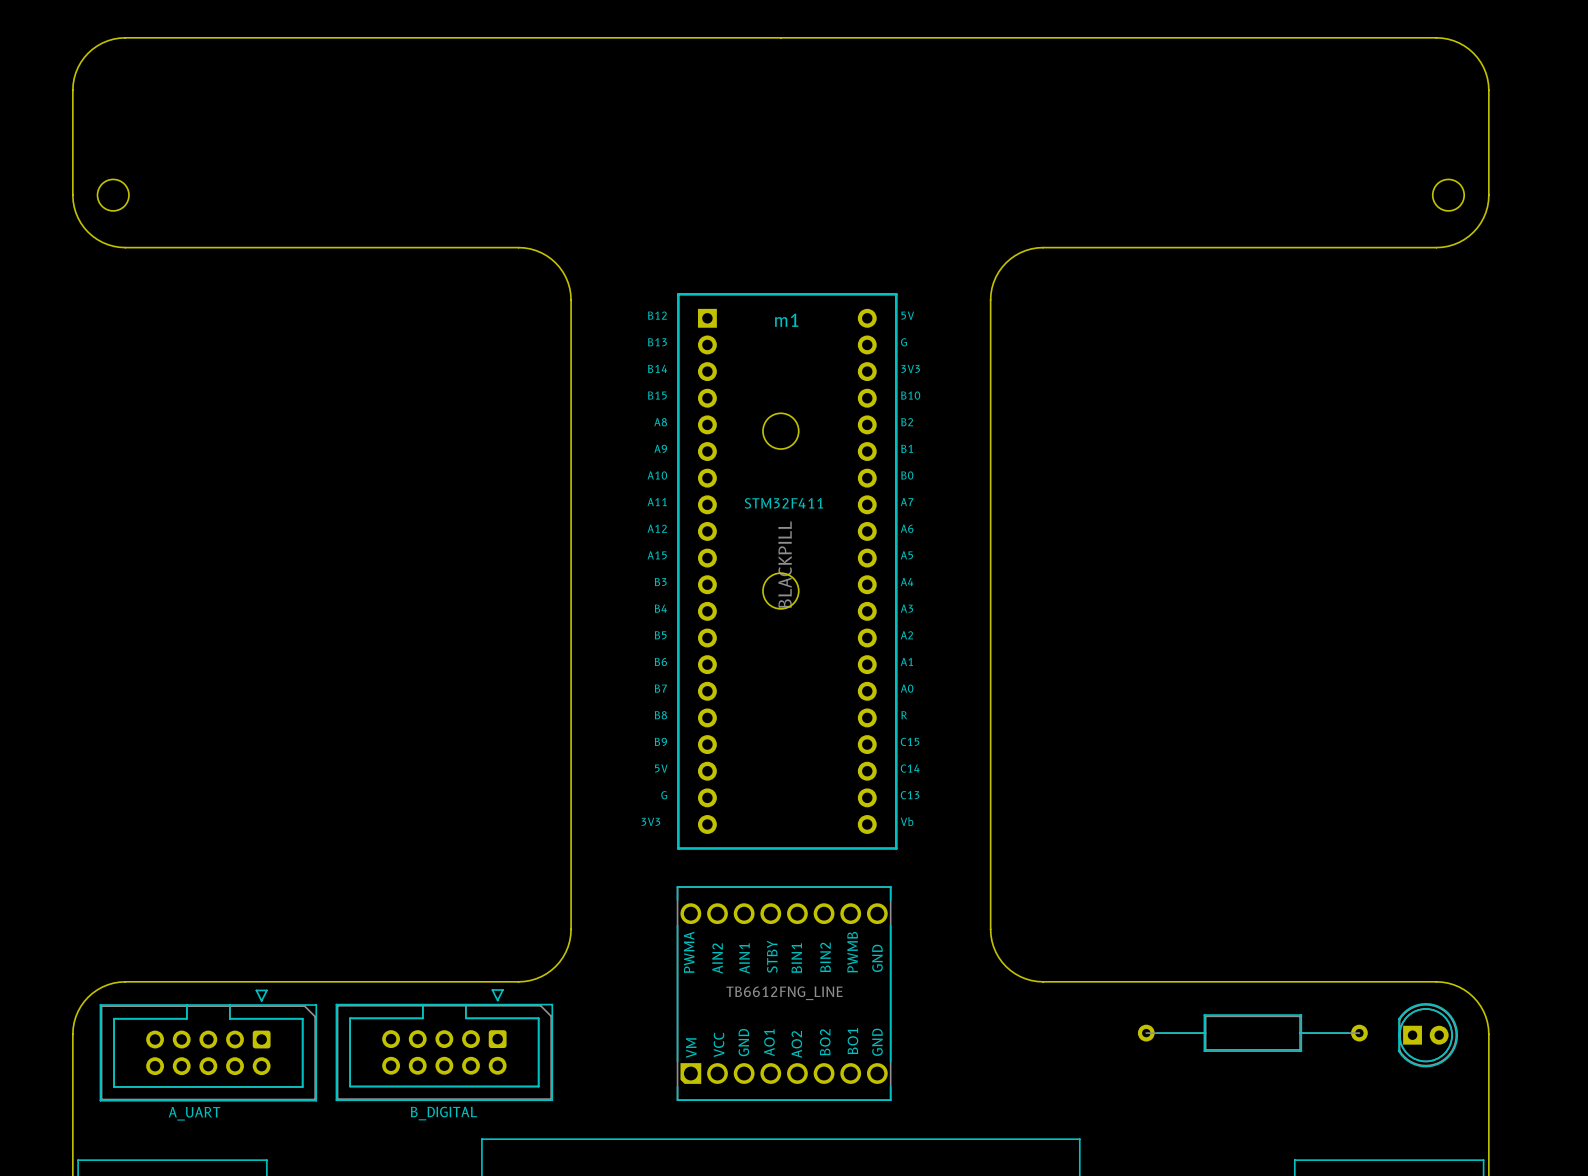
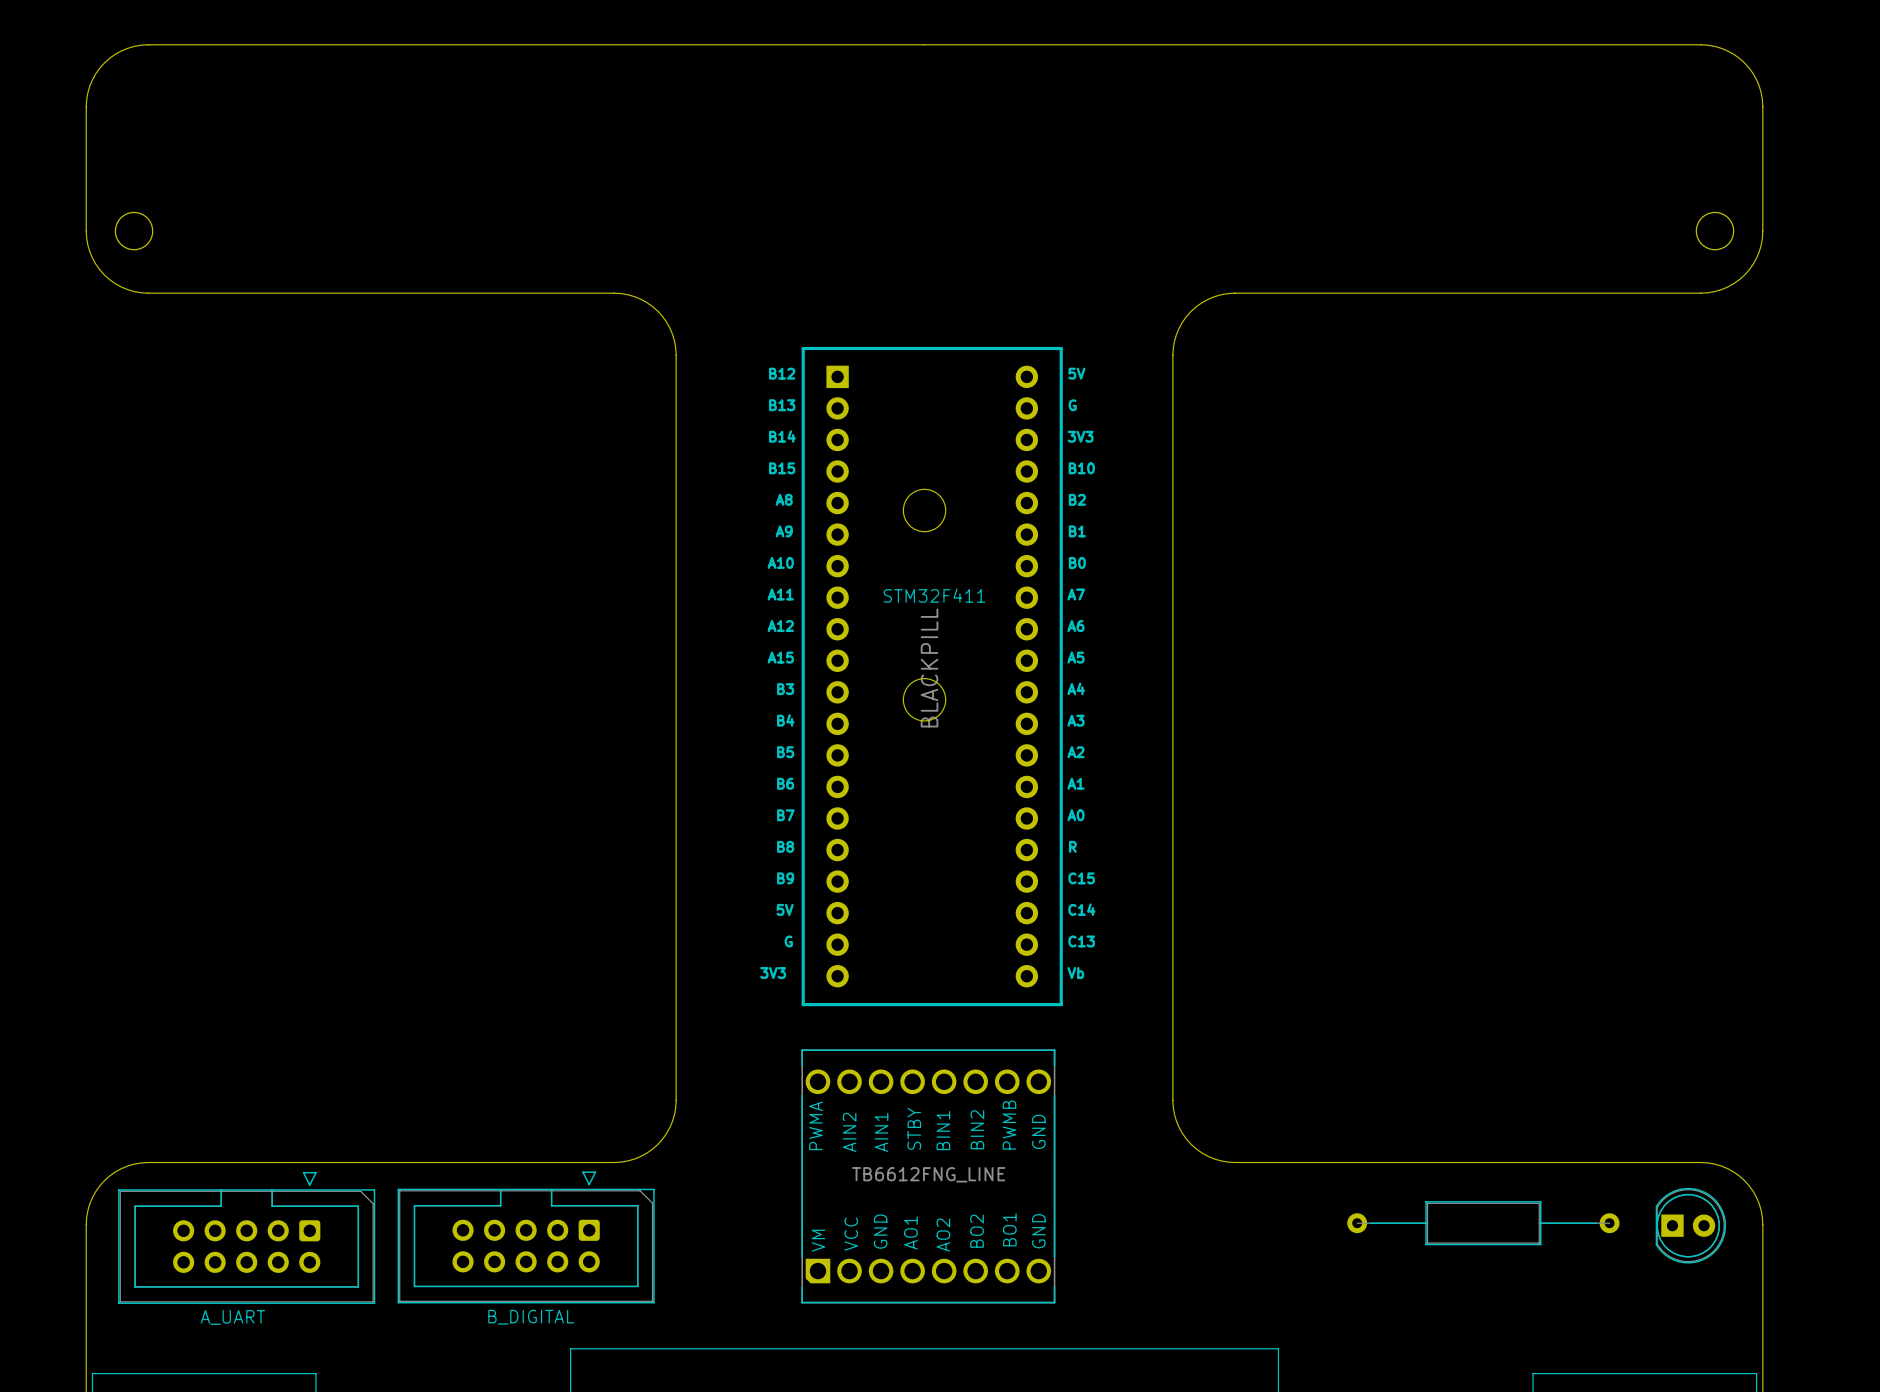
m1 name: m1 (786, 320) -> none

